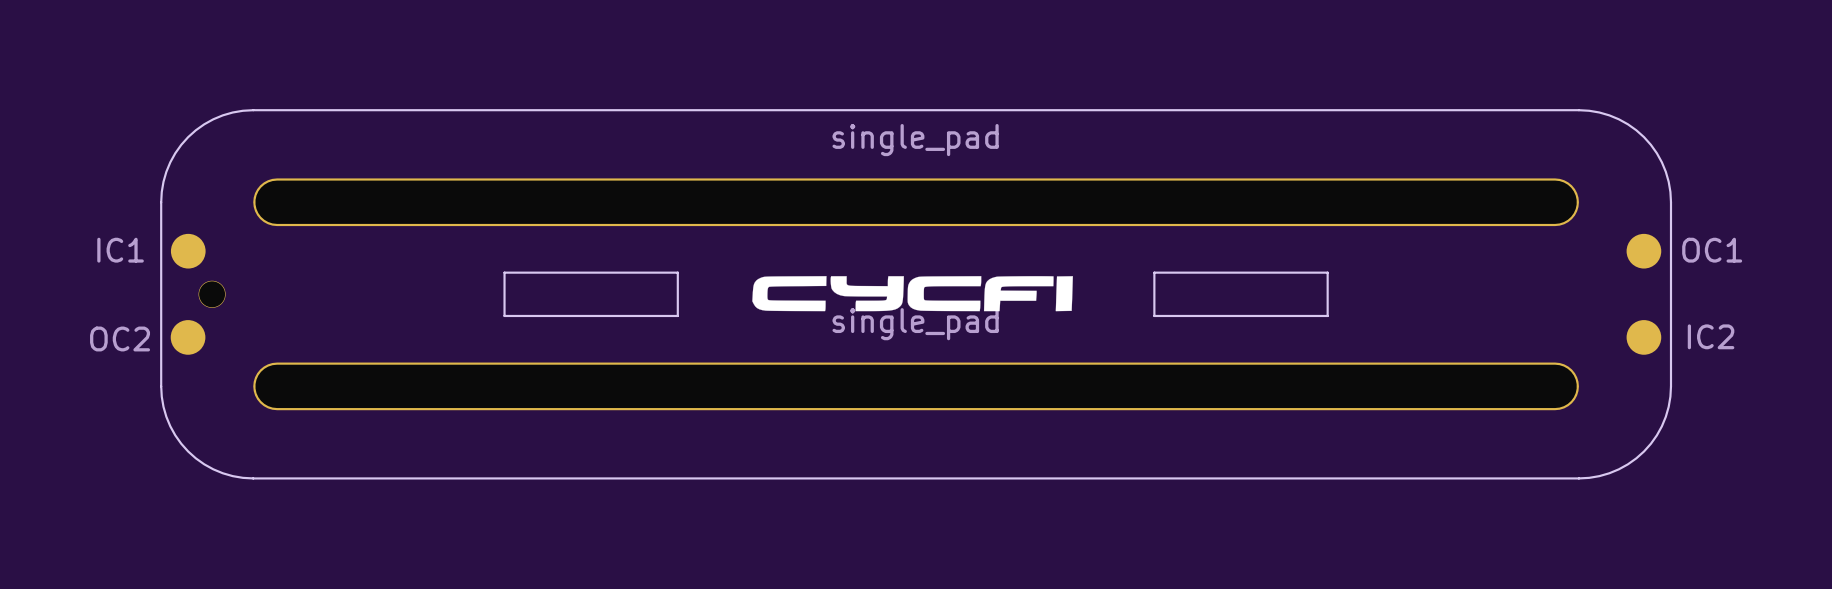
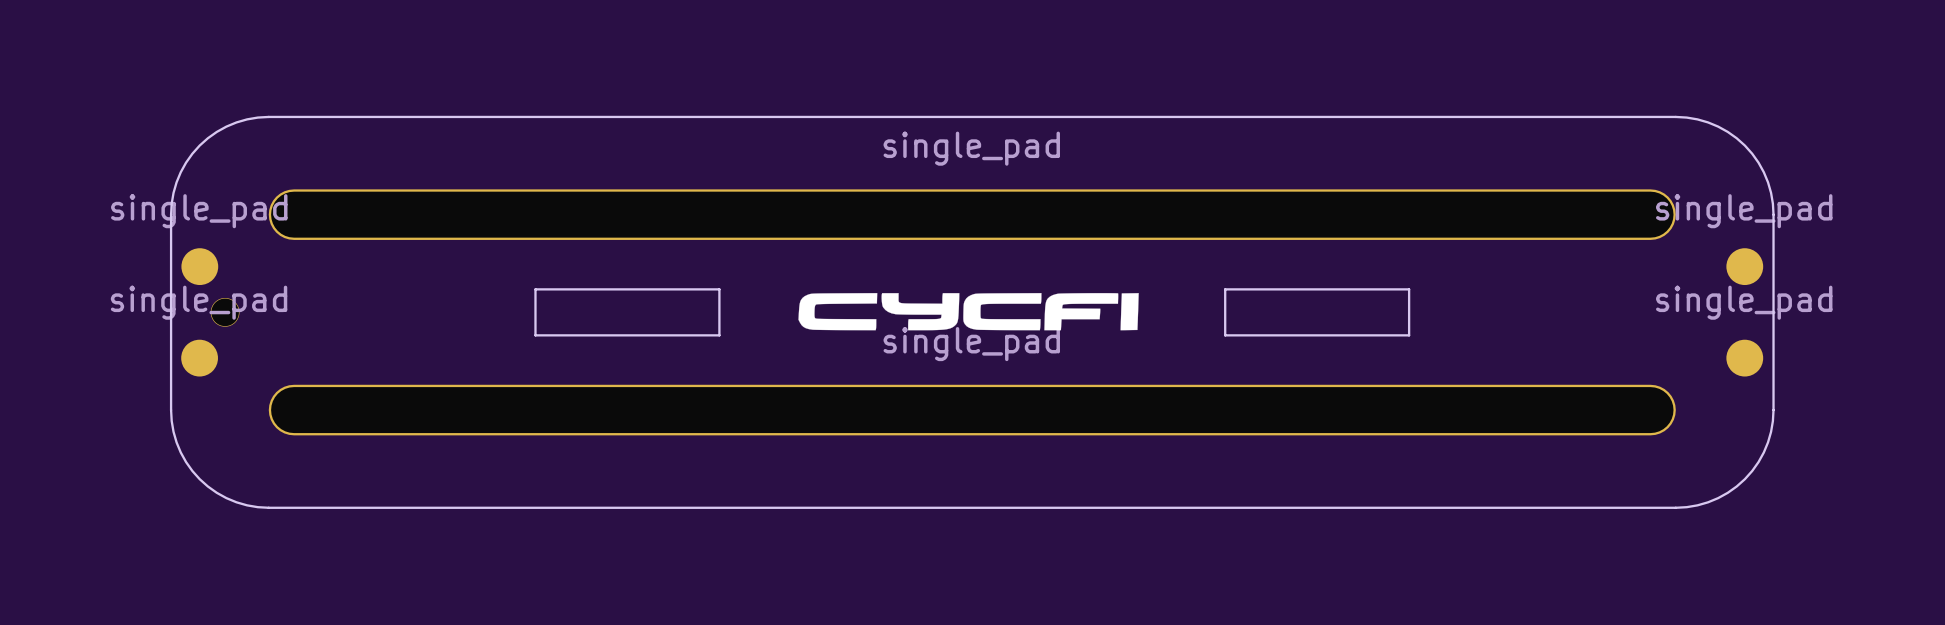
part value: IC1 (120, 250) -> single_pad (199, 211)
part value: OC1 (1712, 250) -> single_pad (1744, 211)
part value: IC2 (1711, 336) -> single_pad (1744, 302)
part value: OC2 (120, 338) -> single_pad (199, 302)

